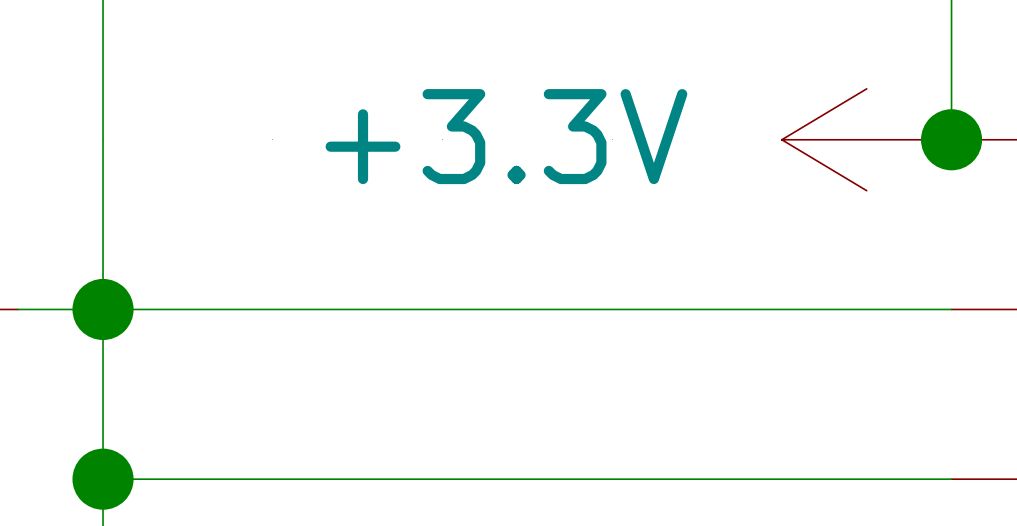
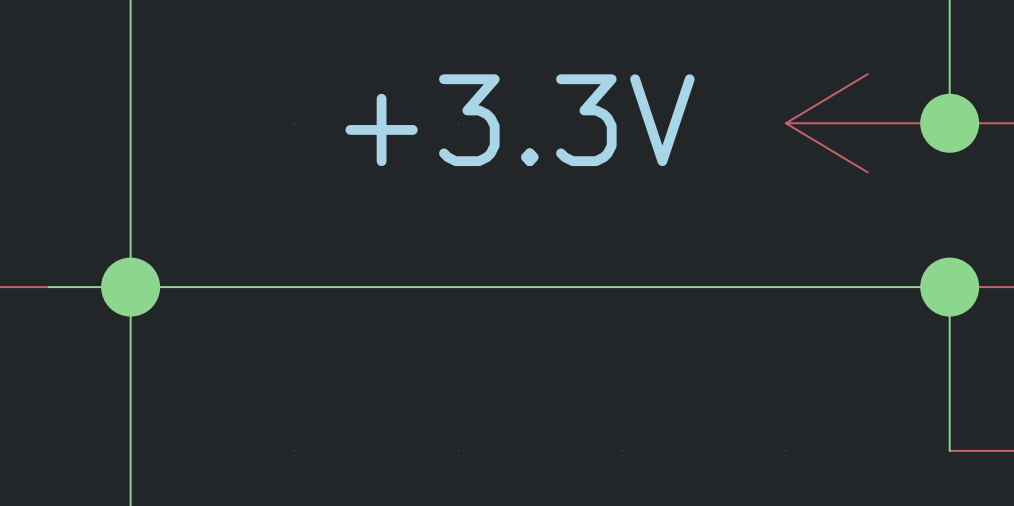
junction: none -> (949, 287)
wire: (103, 479) (951, 479) -> (949, 287) (949, 450)
junction: (103, 479) -> none

